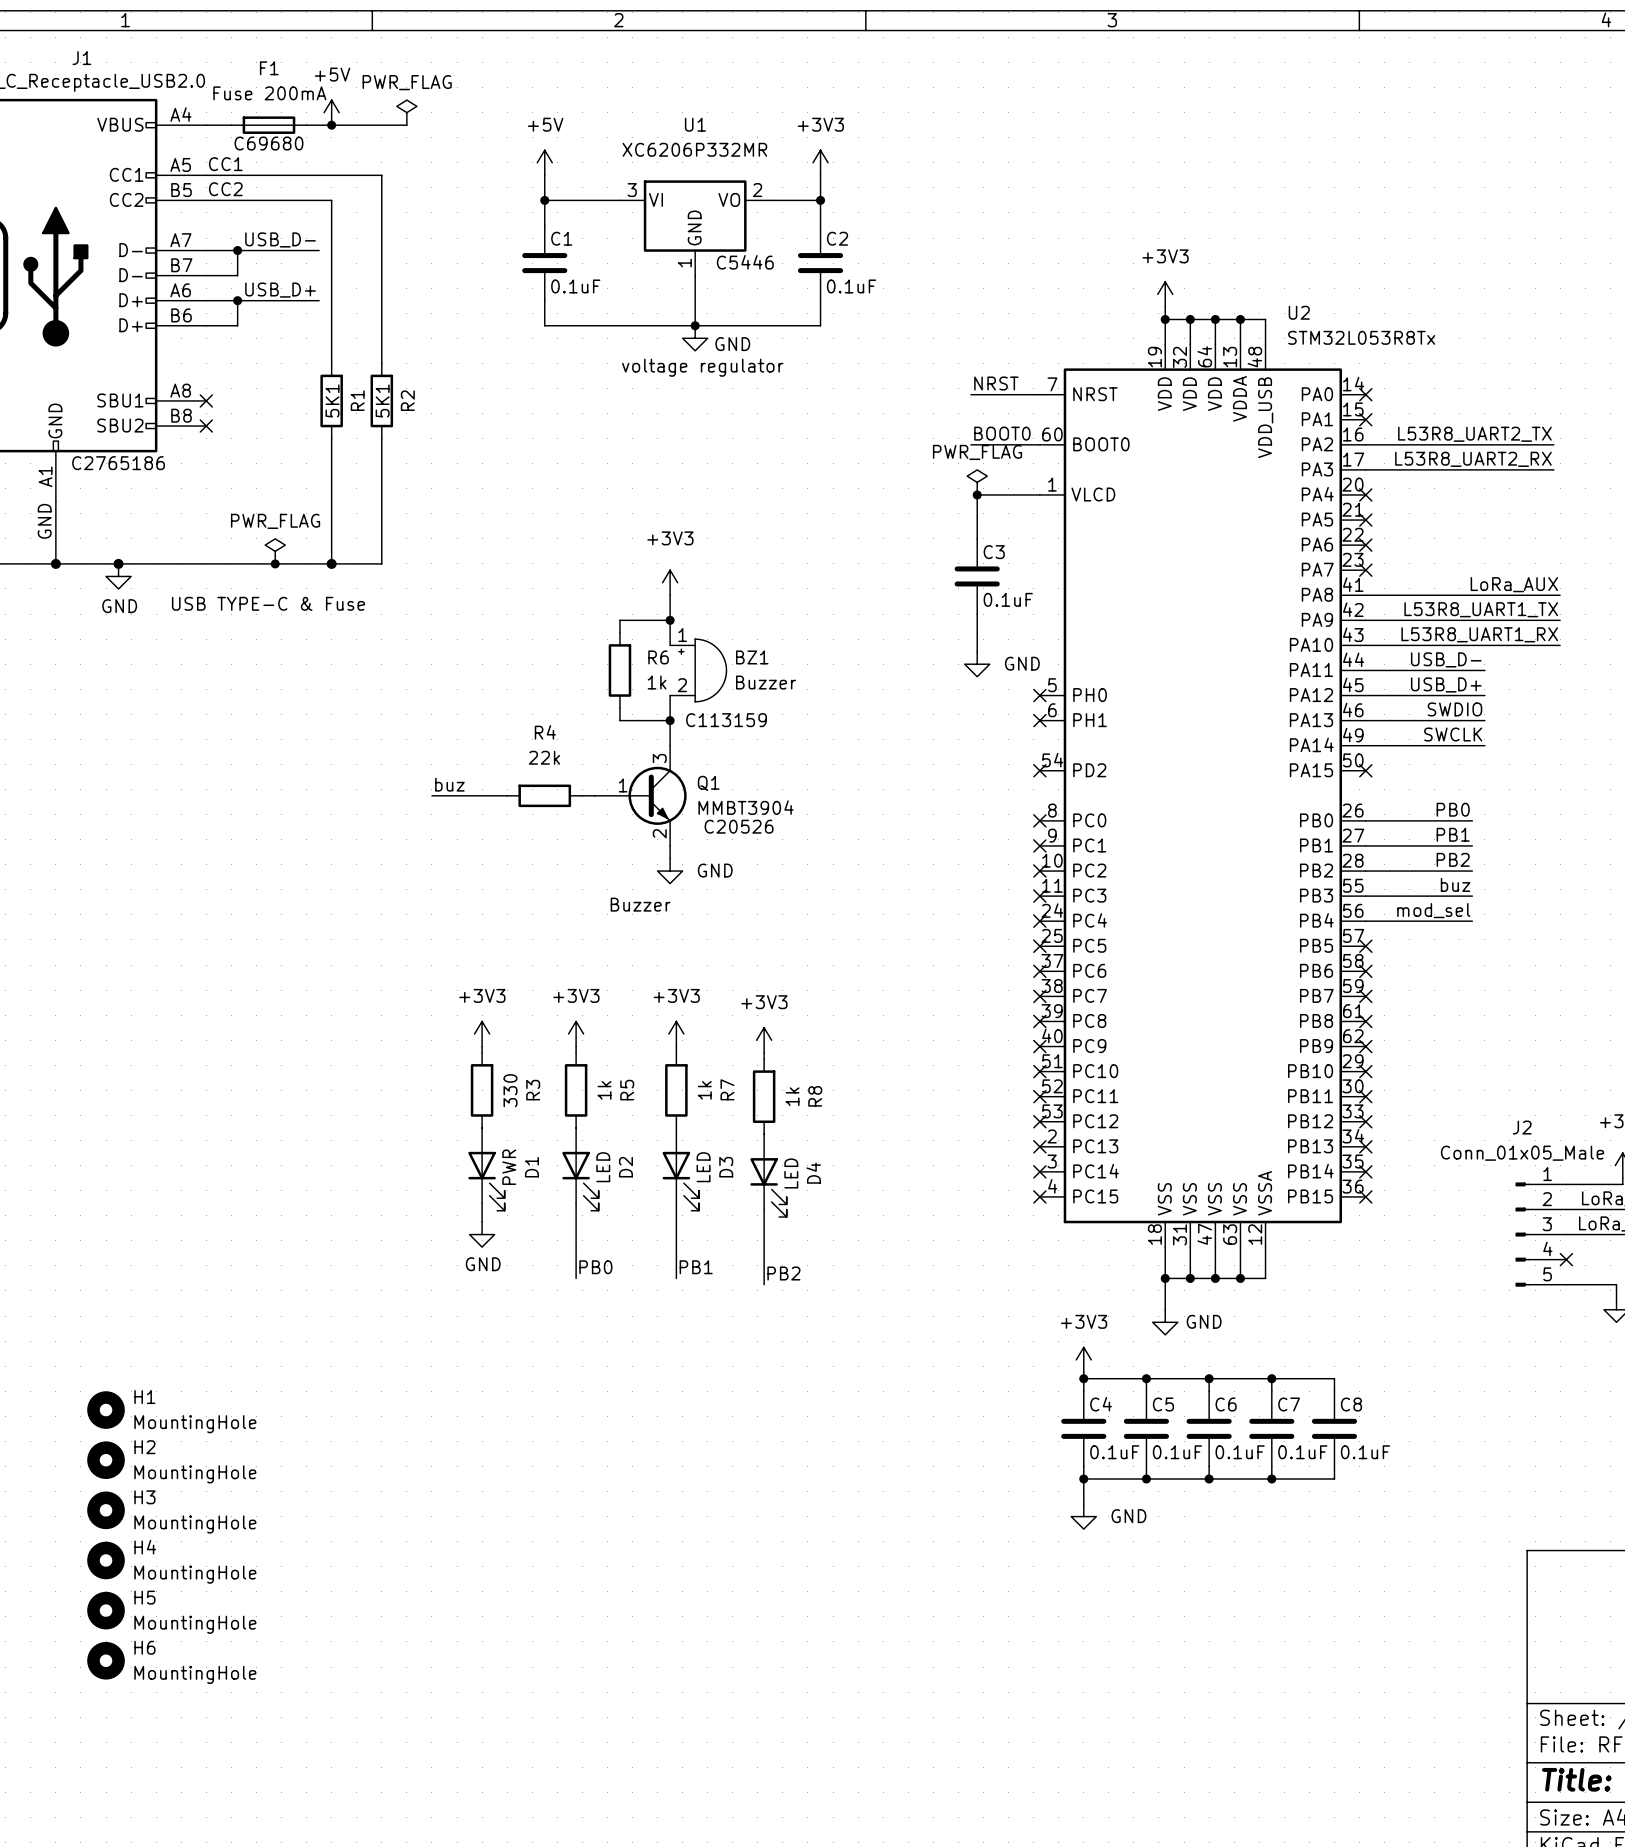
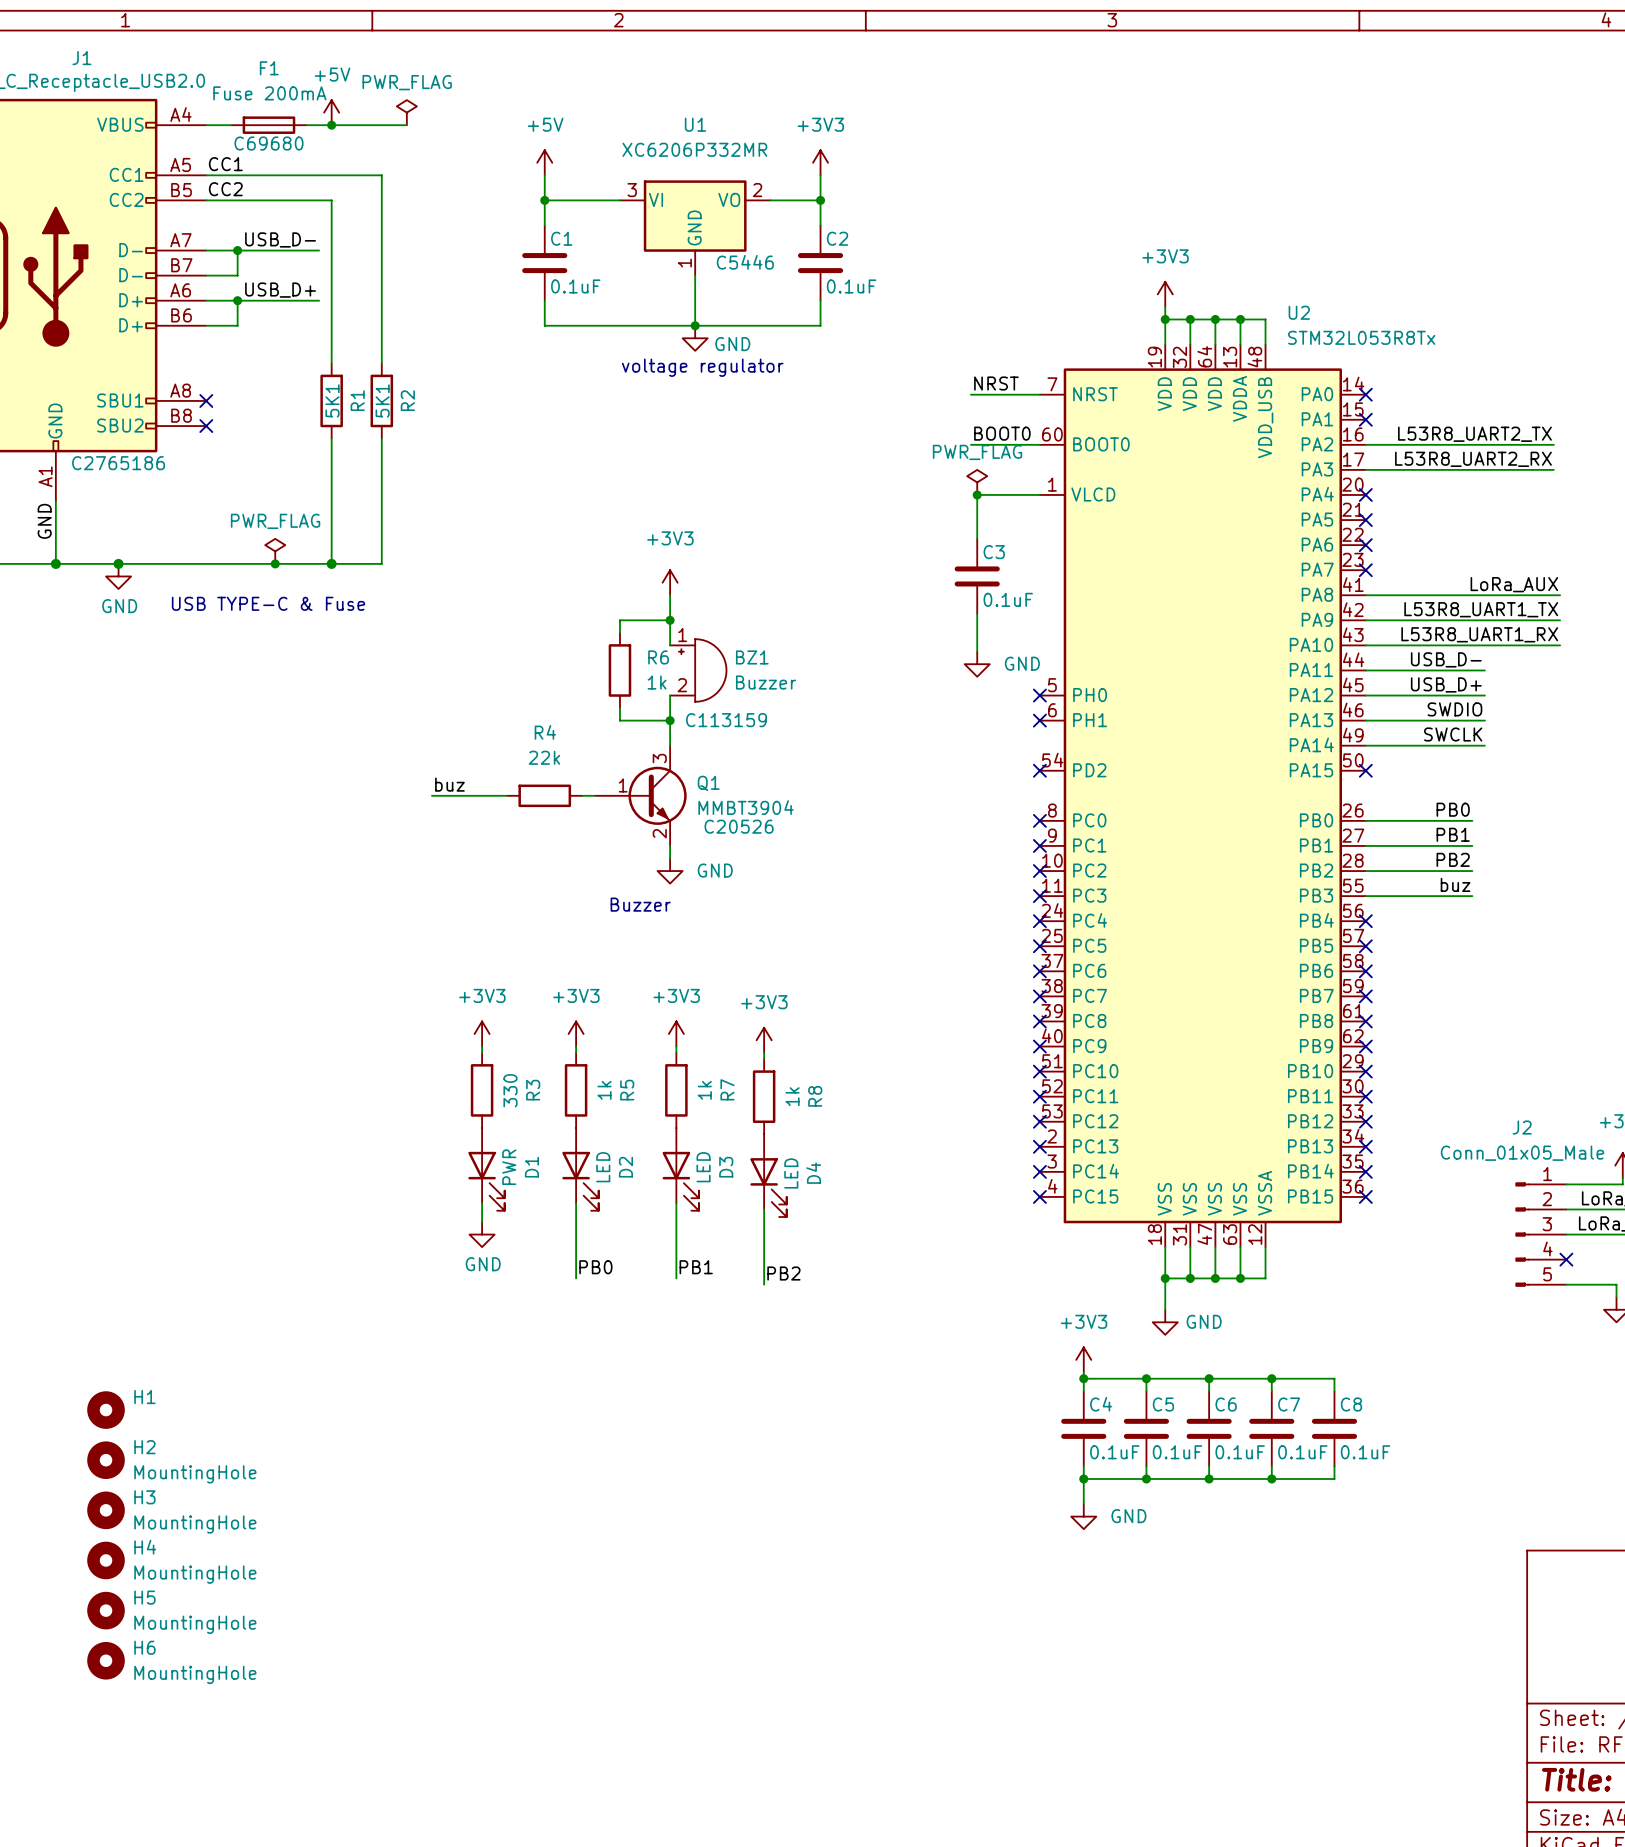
label: mod_sel (1433, 910) -> none
wire: (1365, 921) (1472, 921) -> none
no-connect mark: none -> (1365, 921)
H1 value: MountingHole (195, 1424) -> none

